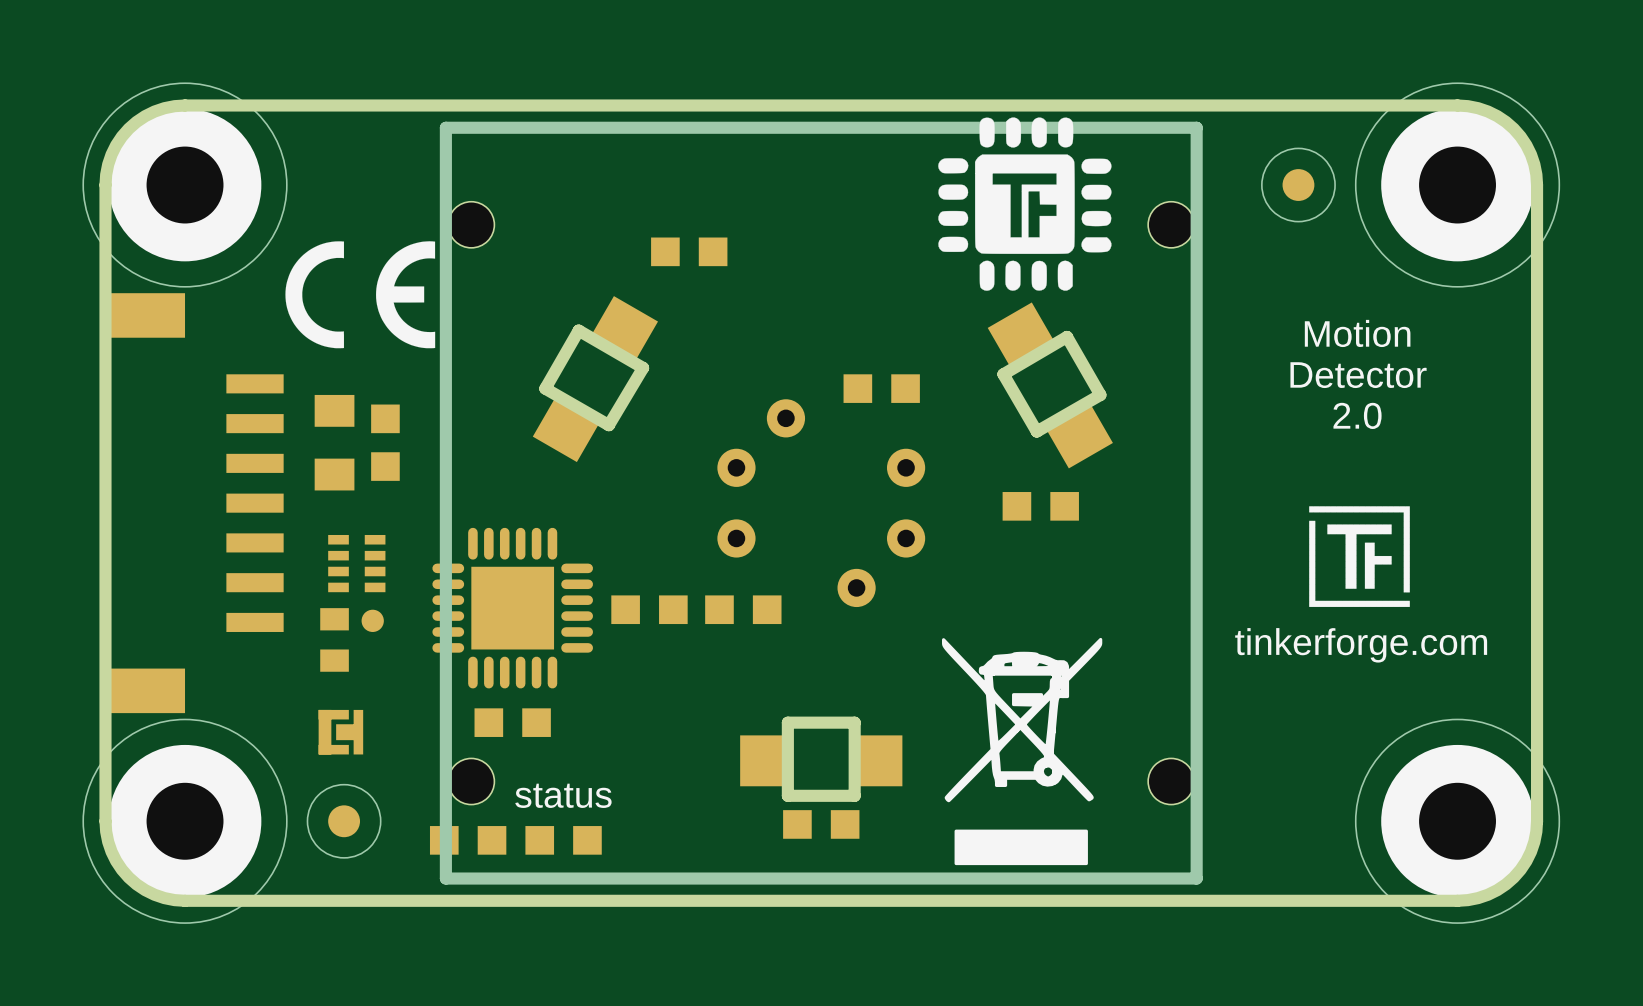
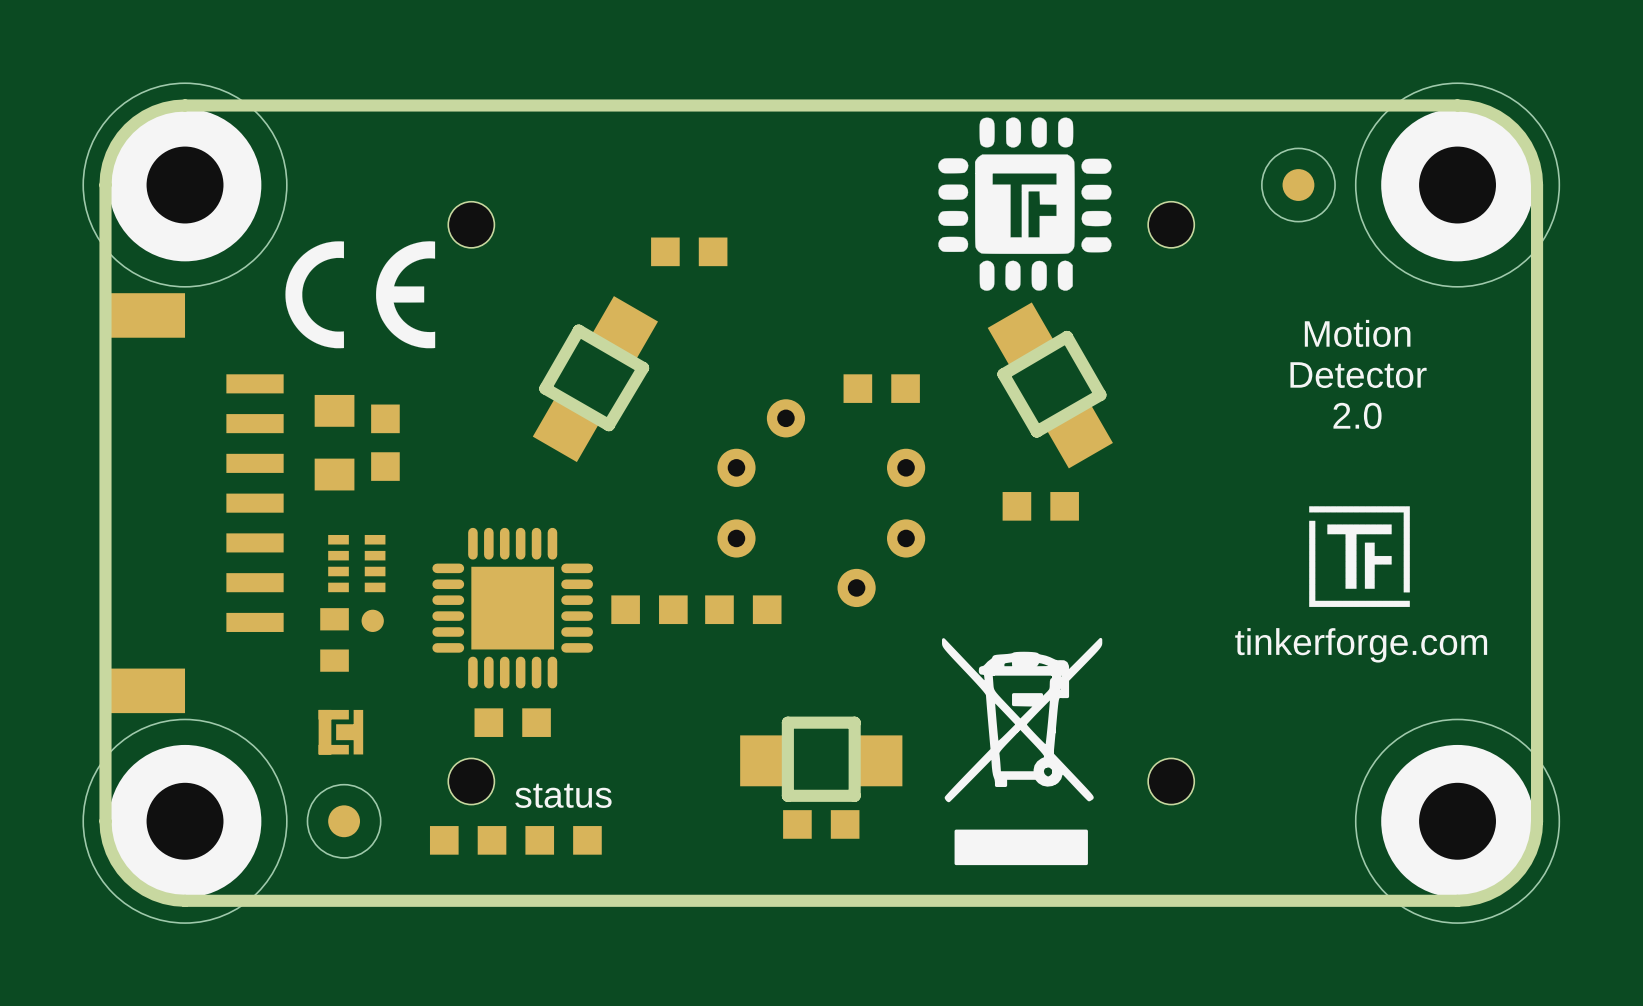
line: (445, 127) (445, 878) (1196, 878) (1196, 127) (445, 127) -> none

